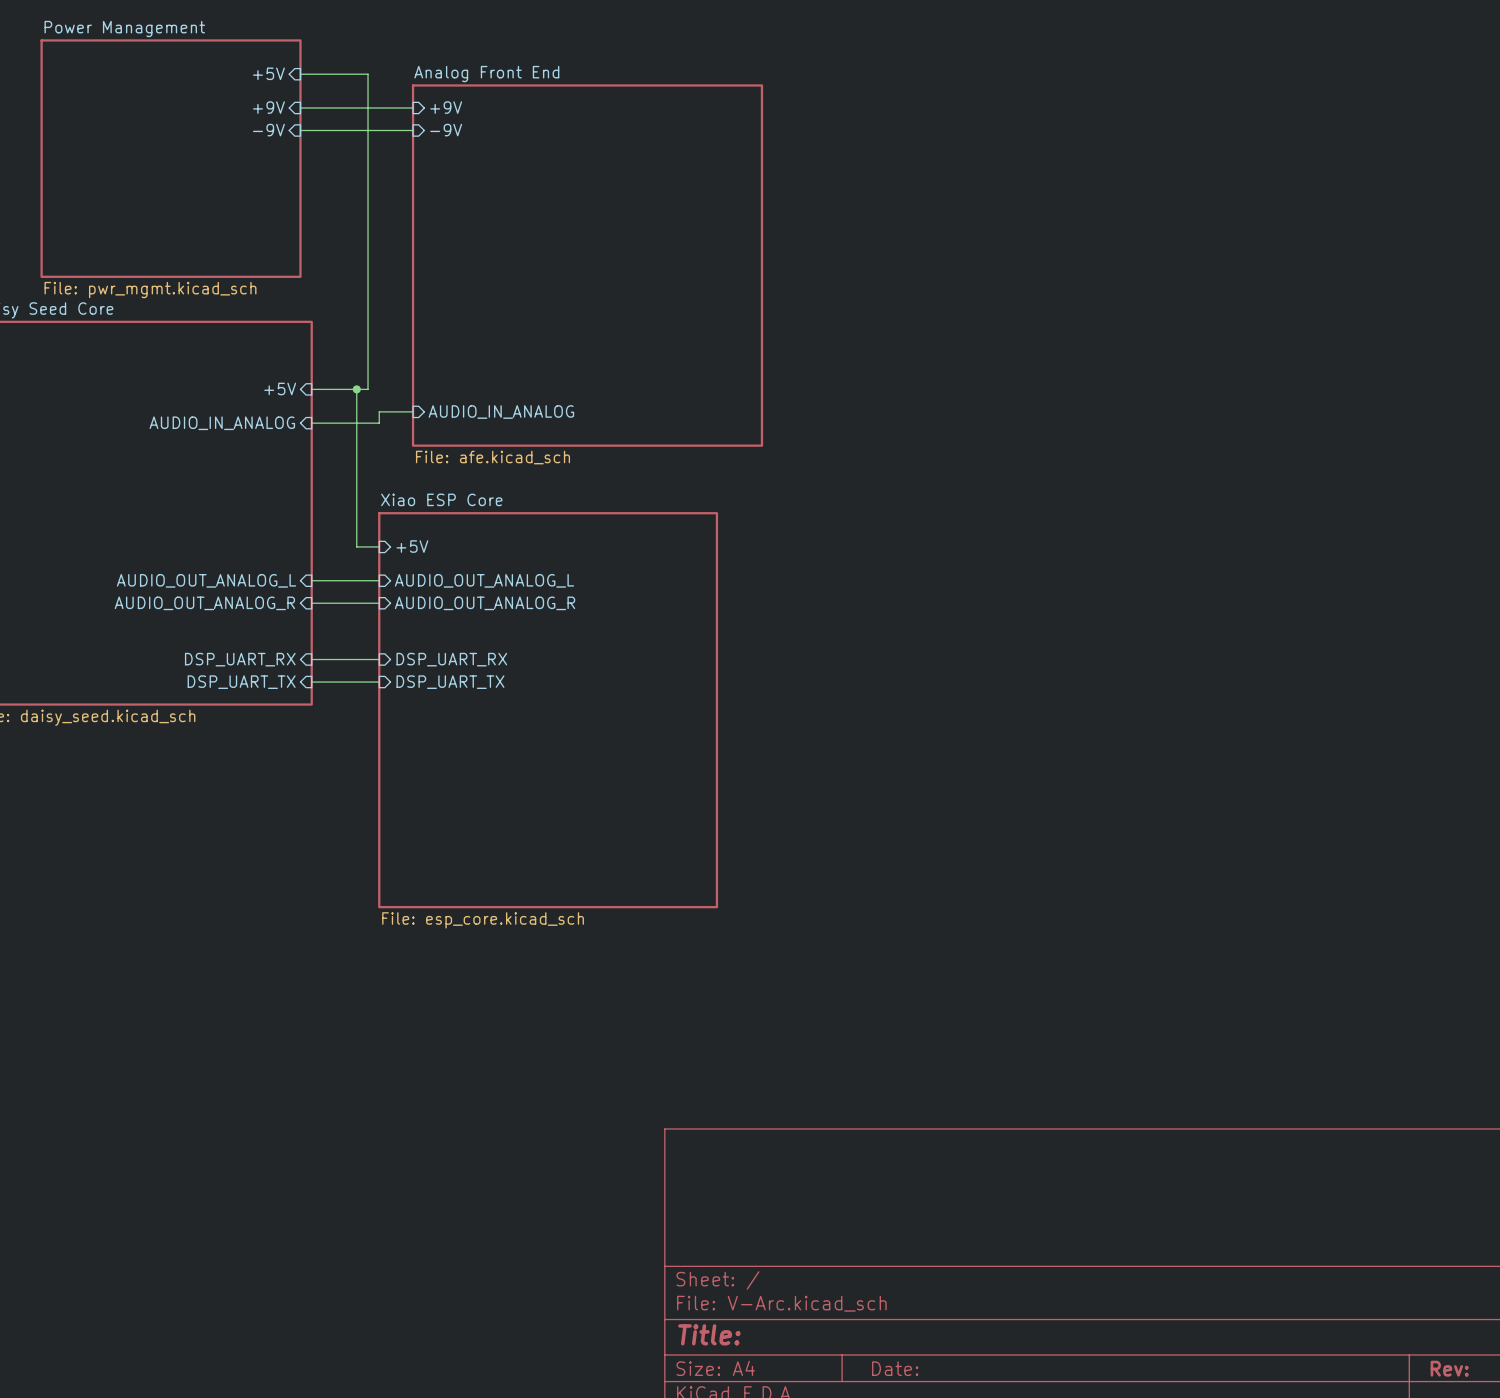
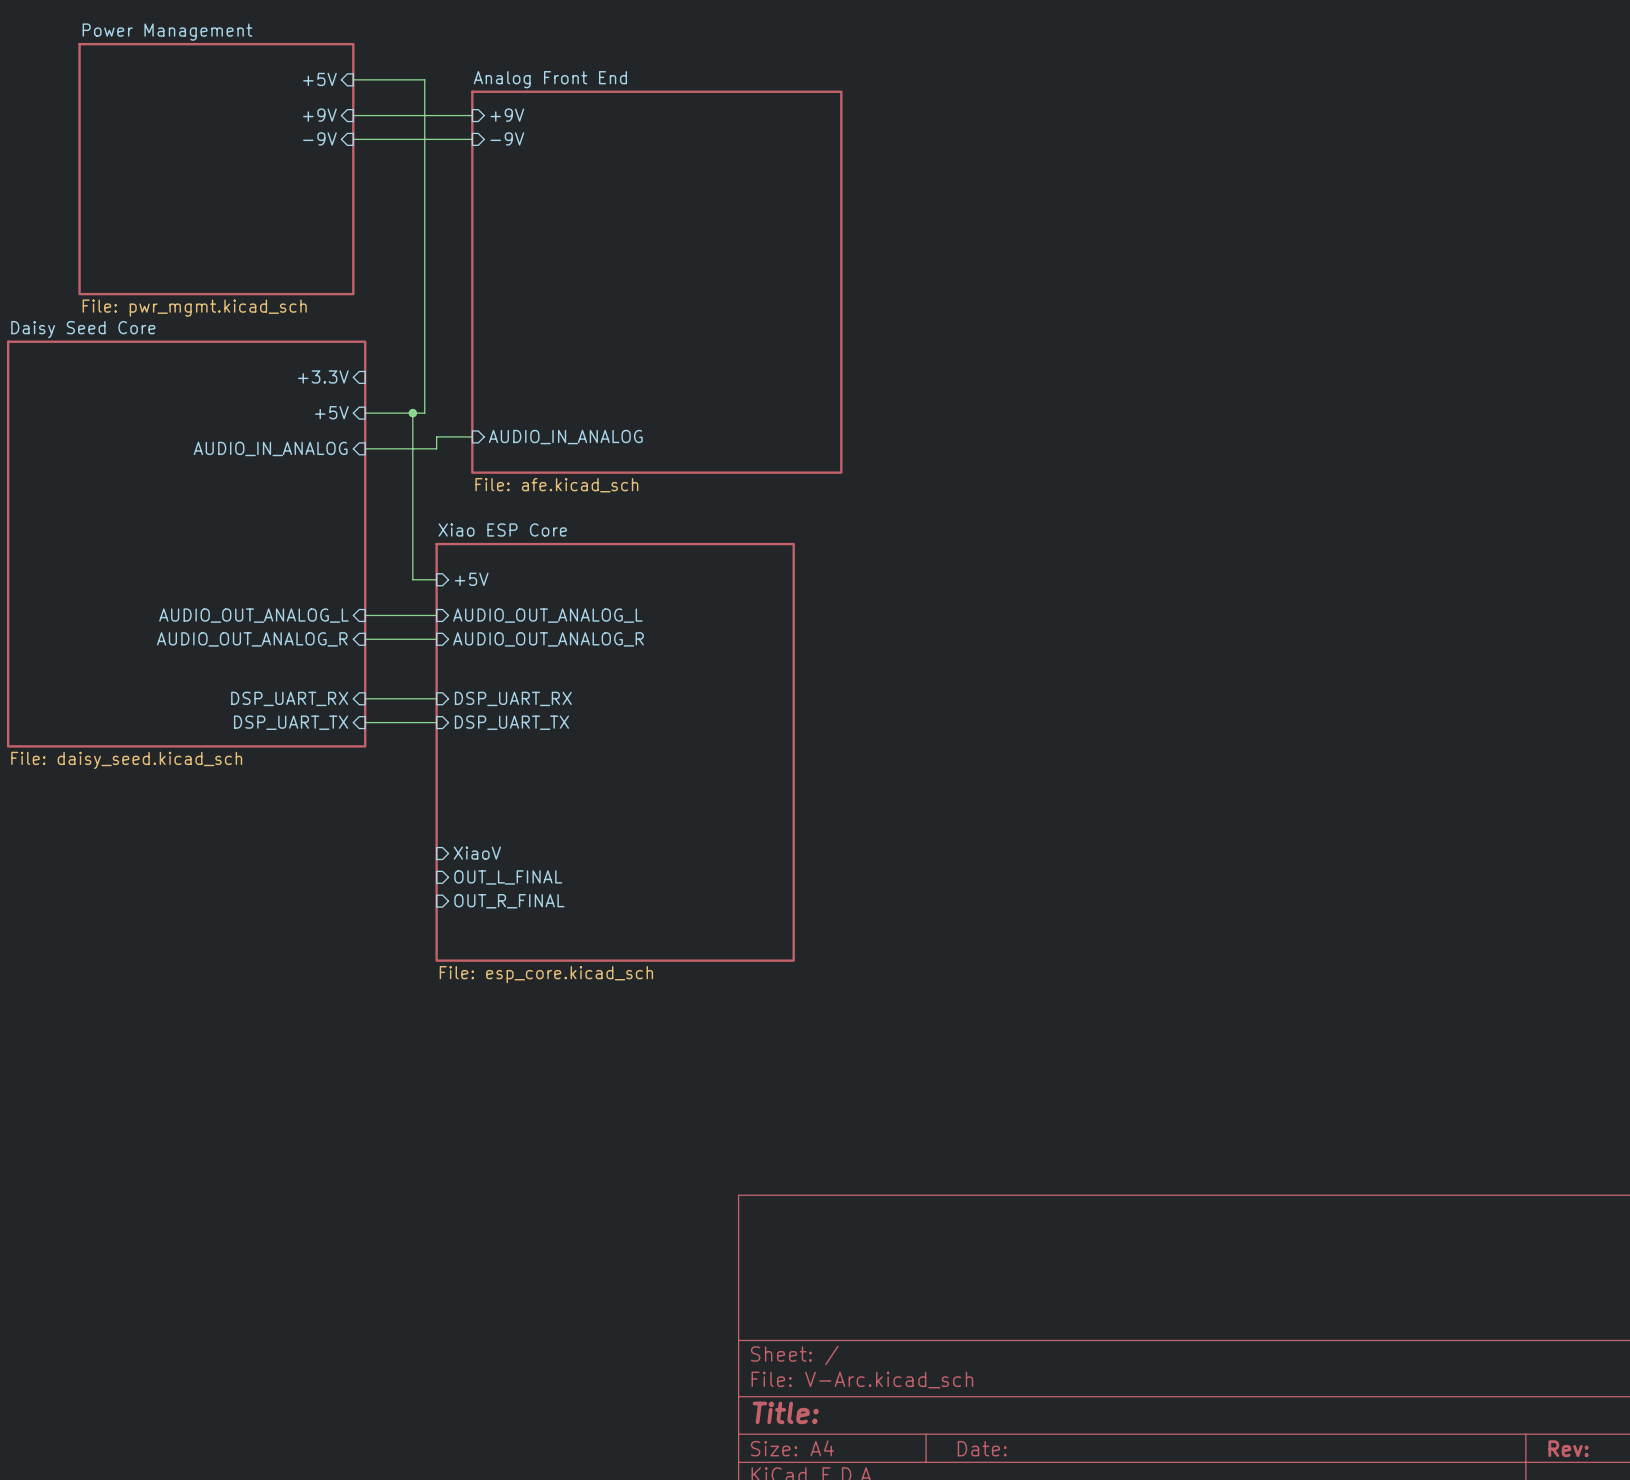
sheet pin: none -> +3.3V (323, 376)
sheet pin: none -> XiaoV (477, 853)
sheet pin: none -> OUT_L_FINAL (508, 877)
sheet pin: none -> OUT_R_FINAL (509, 901)

